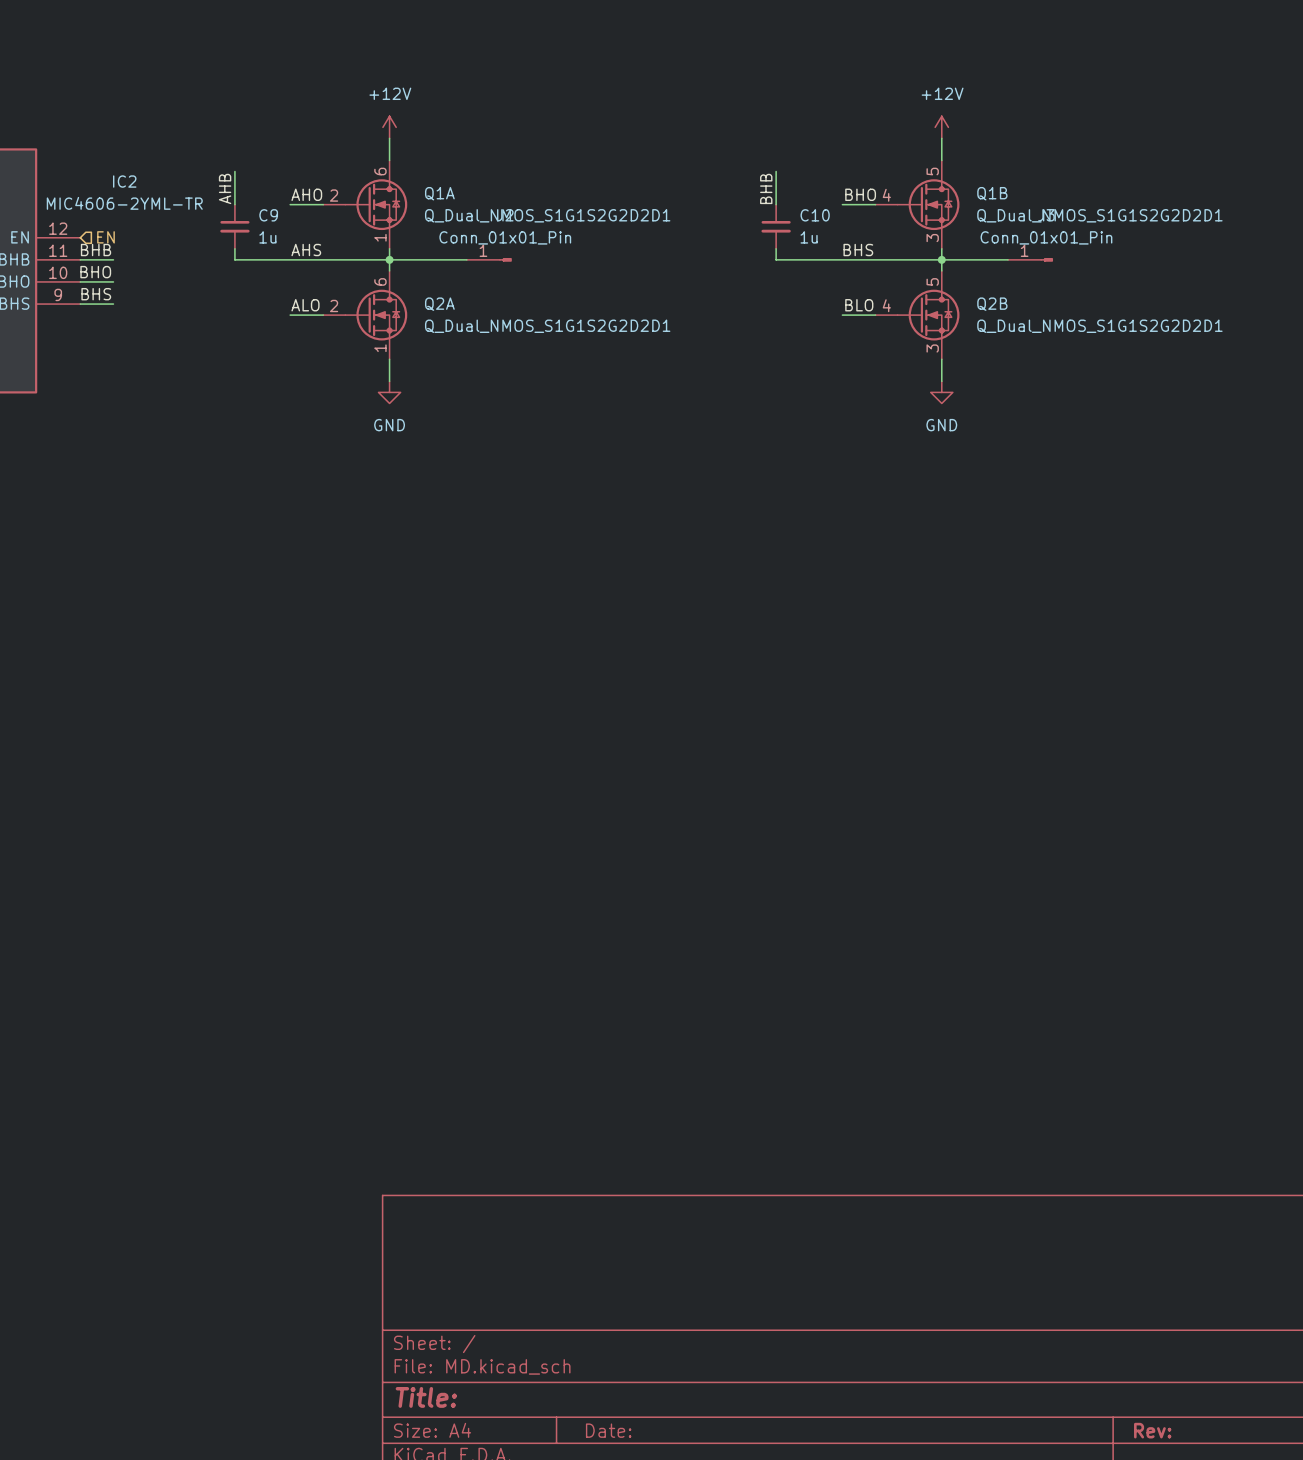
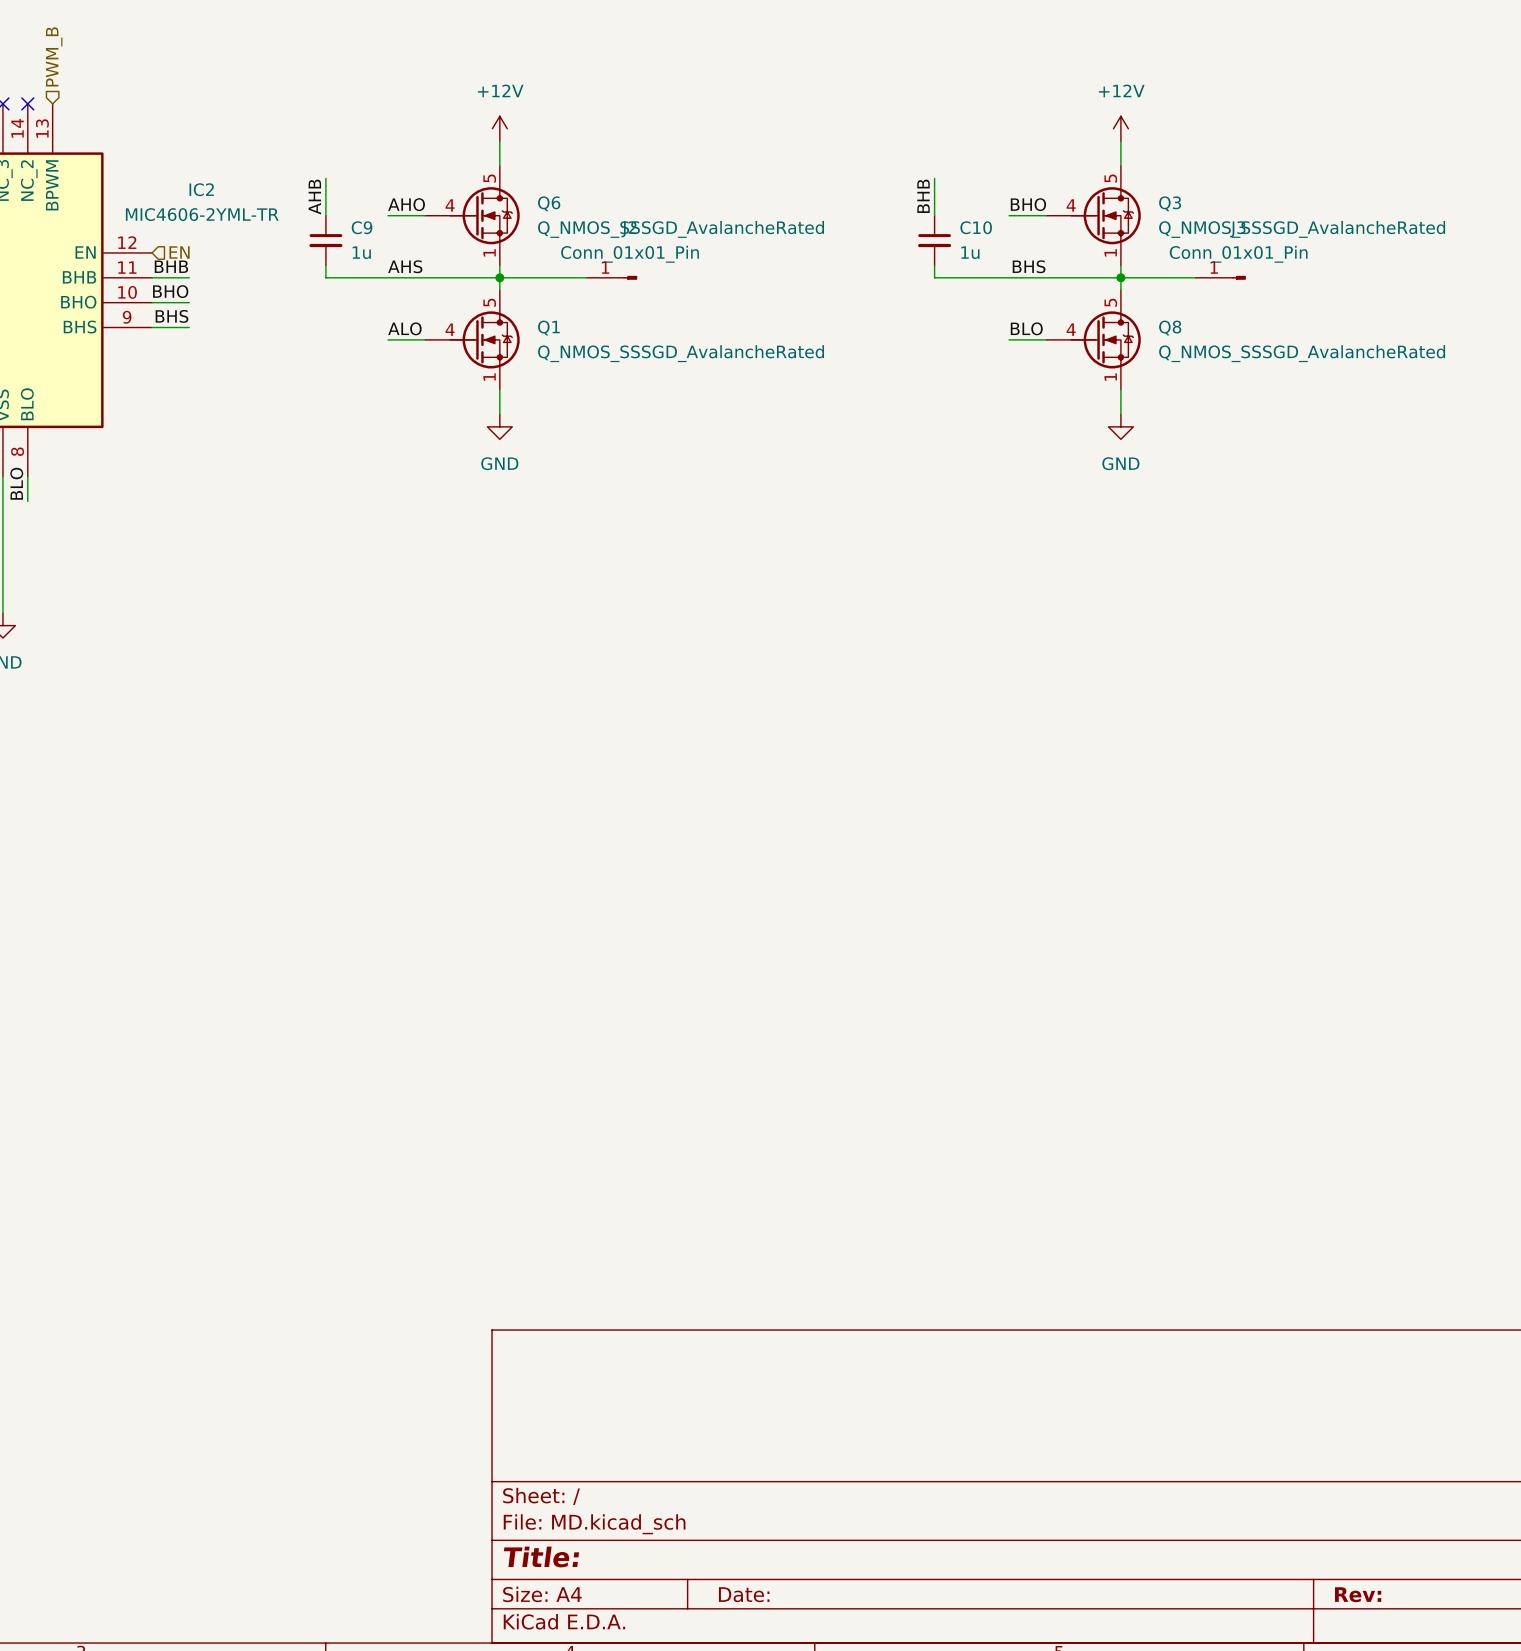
Q1A: Q_Dual_NMOS_S1G1S2G2D2D1 (365, 204) -> none
Q6: none -> Q_NMOS_SSSGD_AvalancheRated (472, 215)
Q1B: Q_Dual_NMOS_S1G1S2G2D2D1 (917, 204) -> none
Q3: none -> Q_NMOS_SSSGD_AvalancheRated (1093, 215)
Q2A: Q_Dual_NMOS_S1G1S2G2D2D1 (365, 315) -> none
Q1: none -> Q_NMOS_SSSGD_AvalancheRated (472, 339)
Q2B: Q_Dual_NMOS_S1G1S2G2D2D1 (917, 315) -> none
Q8: none -> Q_NMOS_SSSGD_AvalancheRated (1093, 339)

